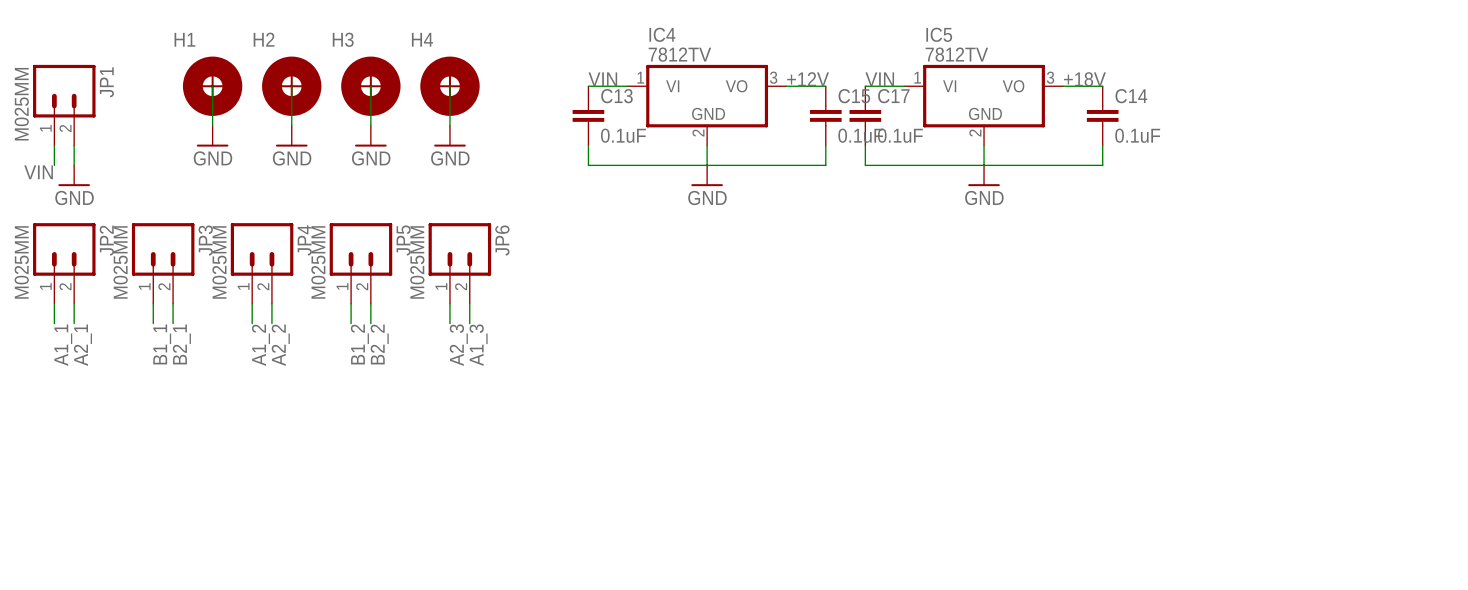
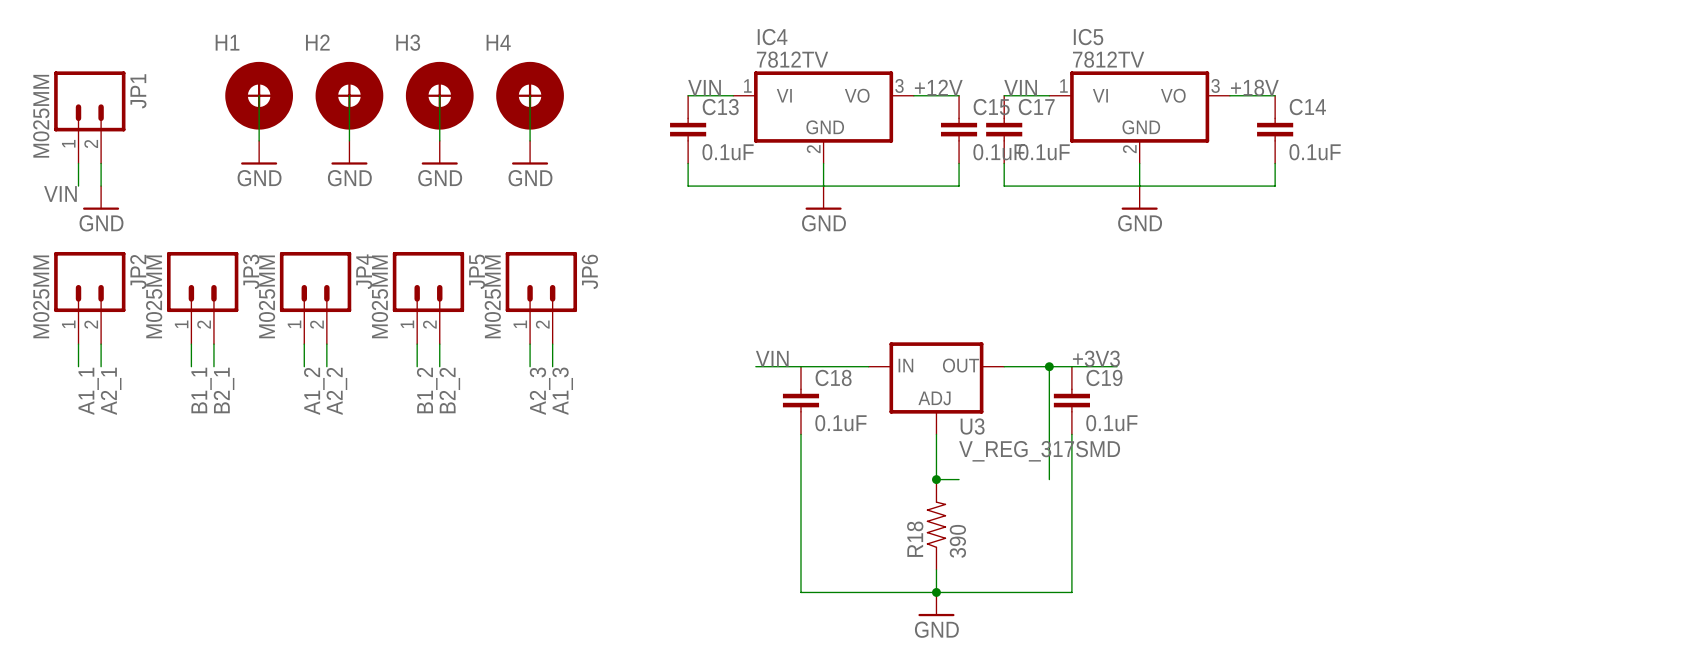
label: none -> VIN (772, 358)
label: none -> +3V3 (1096, 358)
wire: none -> (755, 366) (868, 366)
wire: none -> (1004, 366) (1117, 366)
wire: none -> (1049, 366) (1049, 479)
junction: none -> (1049, 366)
U3: none -> V_REG_317SMD (936, 388)
C18: none -> 0.1uF (800, 400)
C19: none -> 0.1uF (1071, 400)
wire: none -> (800, 434) (800, 592) (1071, 592) (1071, 434)
wire: none -> (936, 434) (936, 479) (959, 479)
junction: none -> (936, 479)
R18: none -> 390 (936, 524)
wire: none -> (936, 569) (936, 592)
junction: none -> (936, 592)
power symbol: none -> GND (936, 604)

